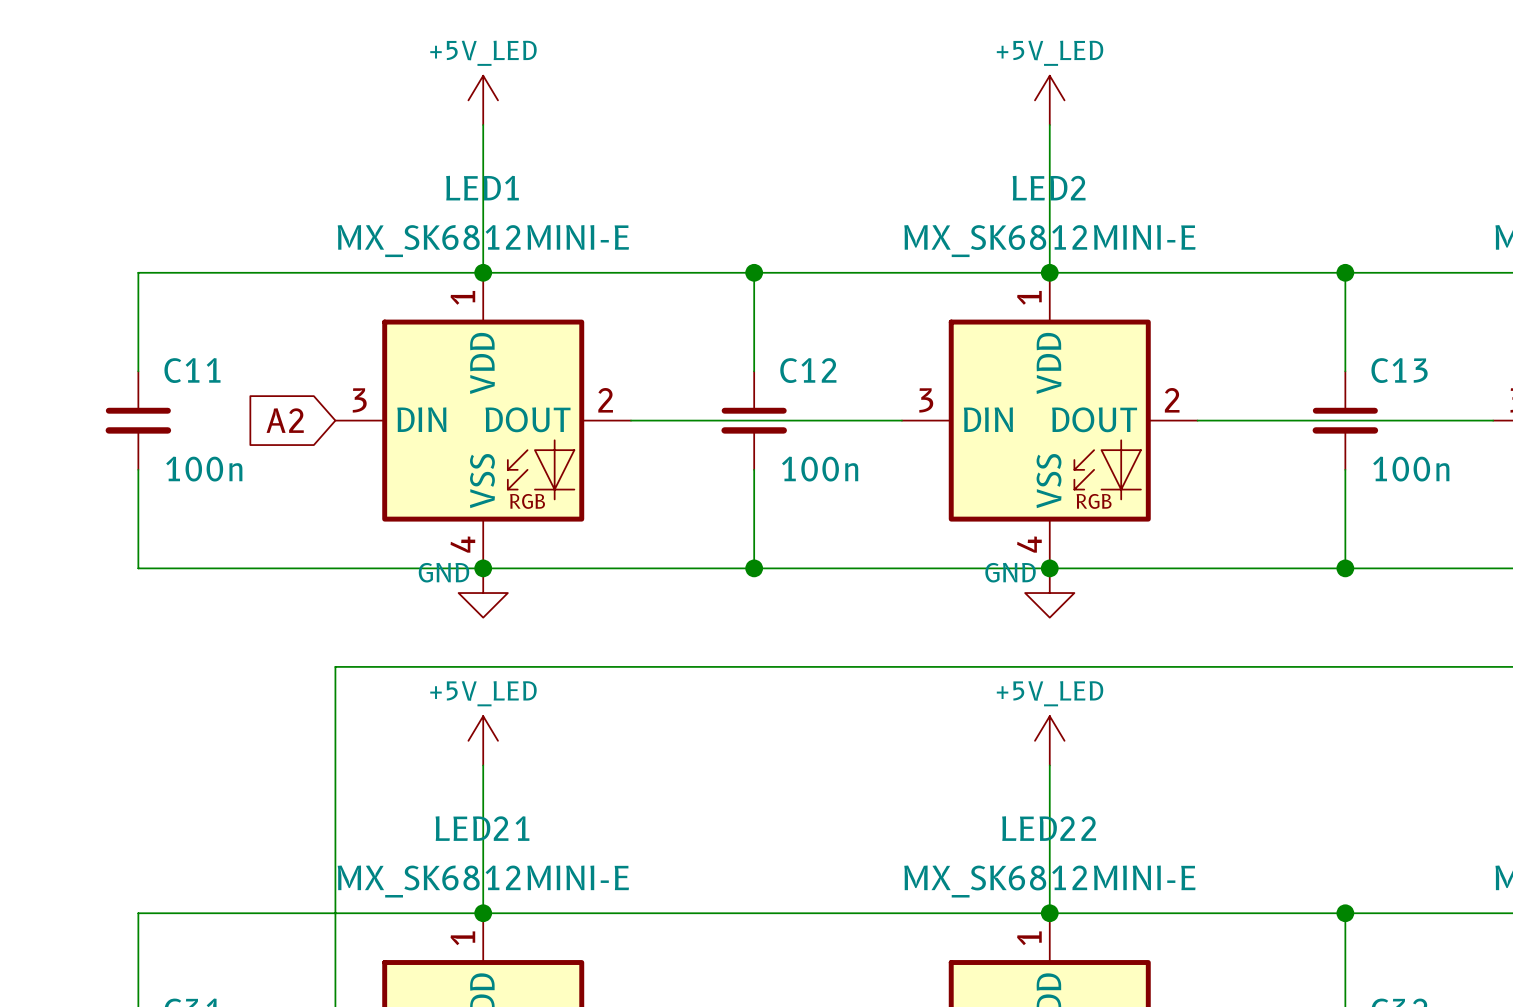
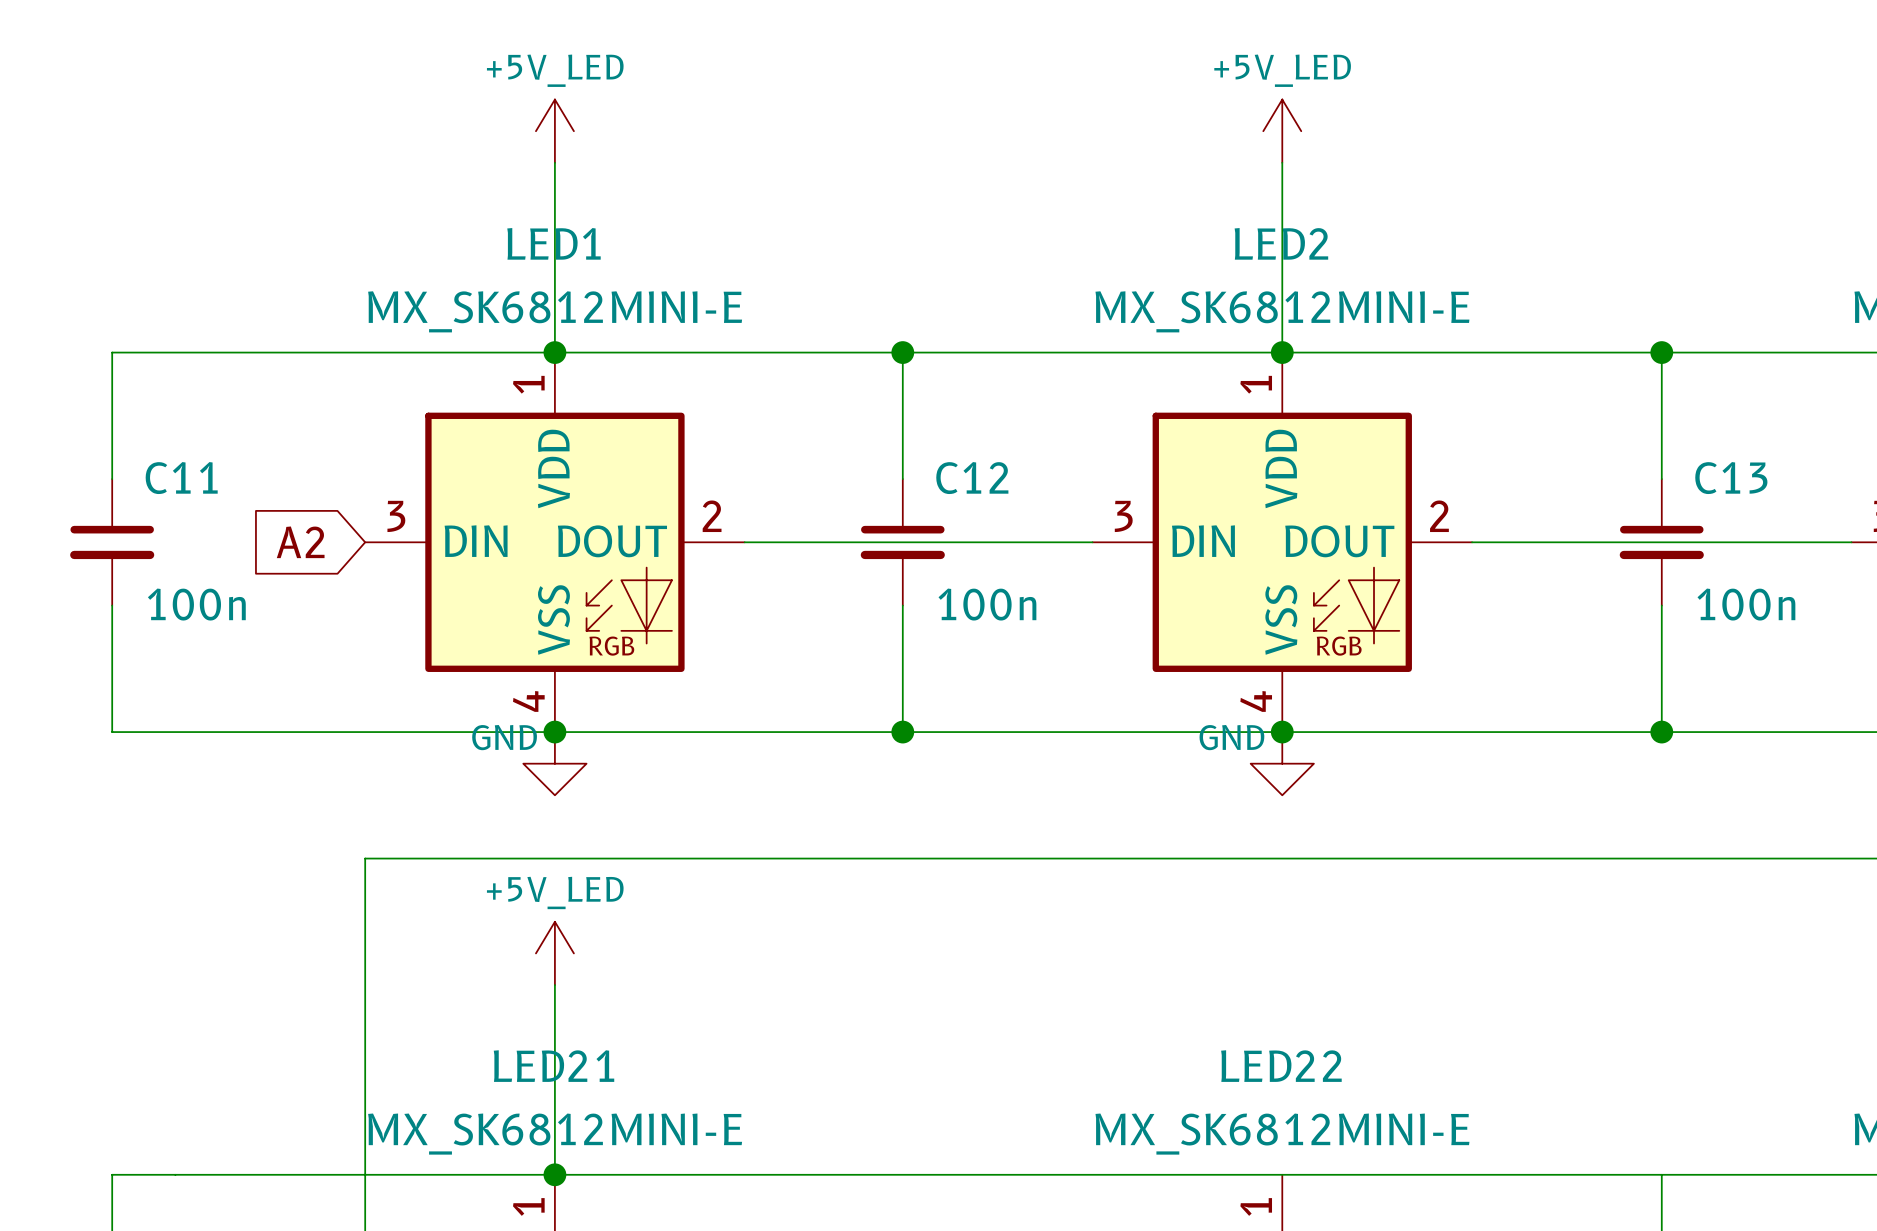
power symbol: +5V_LED (1049, 740) -> none
wire: (1049, 765) (1049, 913) -> none
junction: (1049, 913) -> none
junction: (1345, 913) -> none

